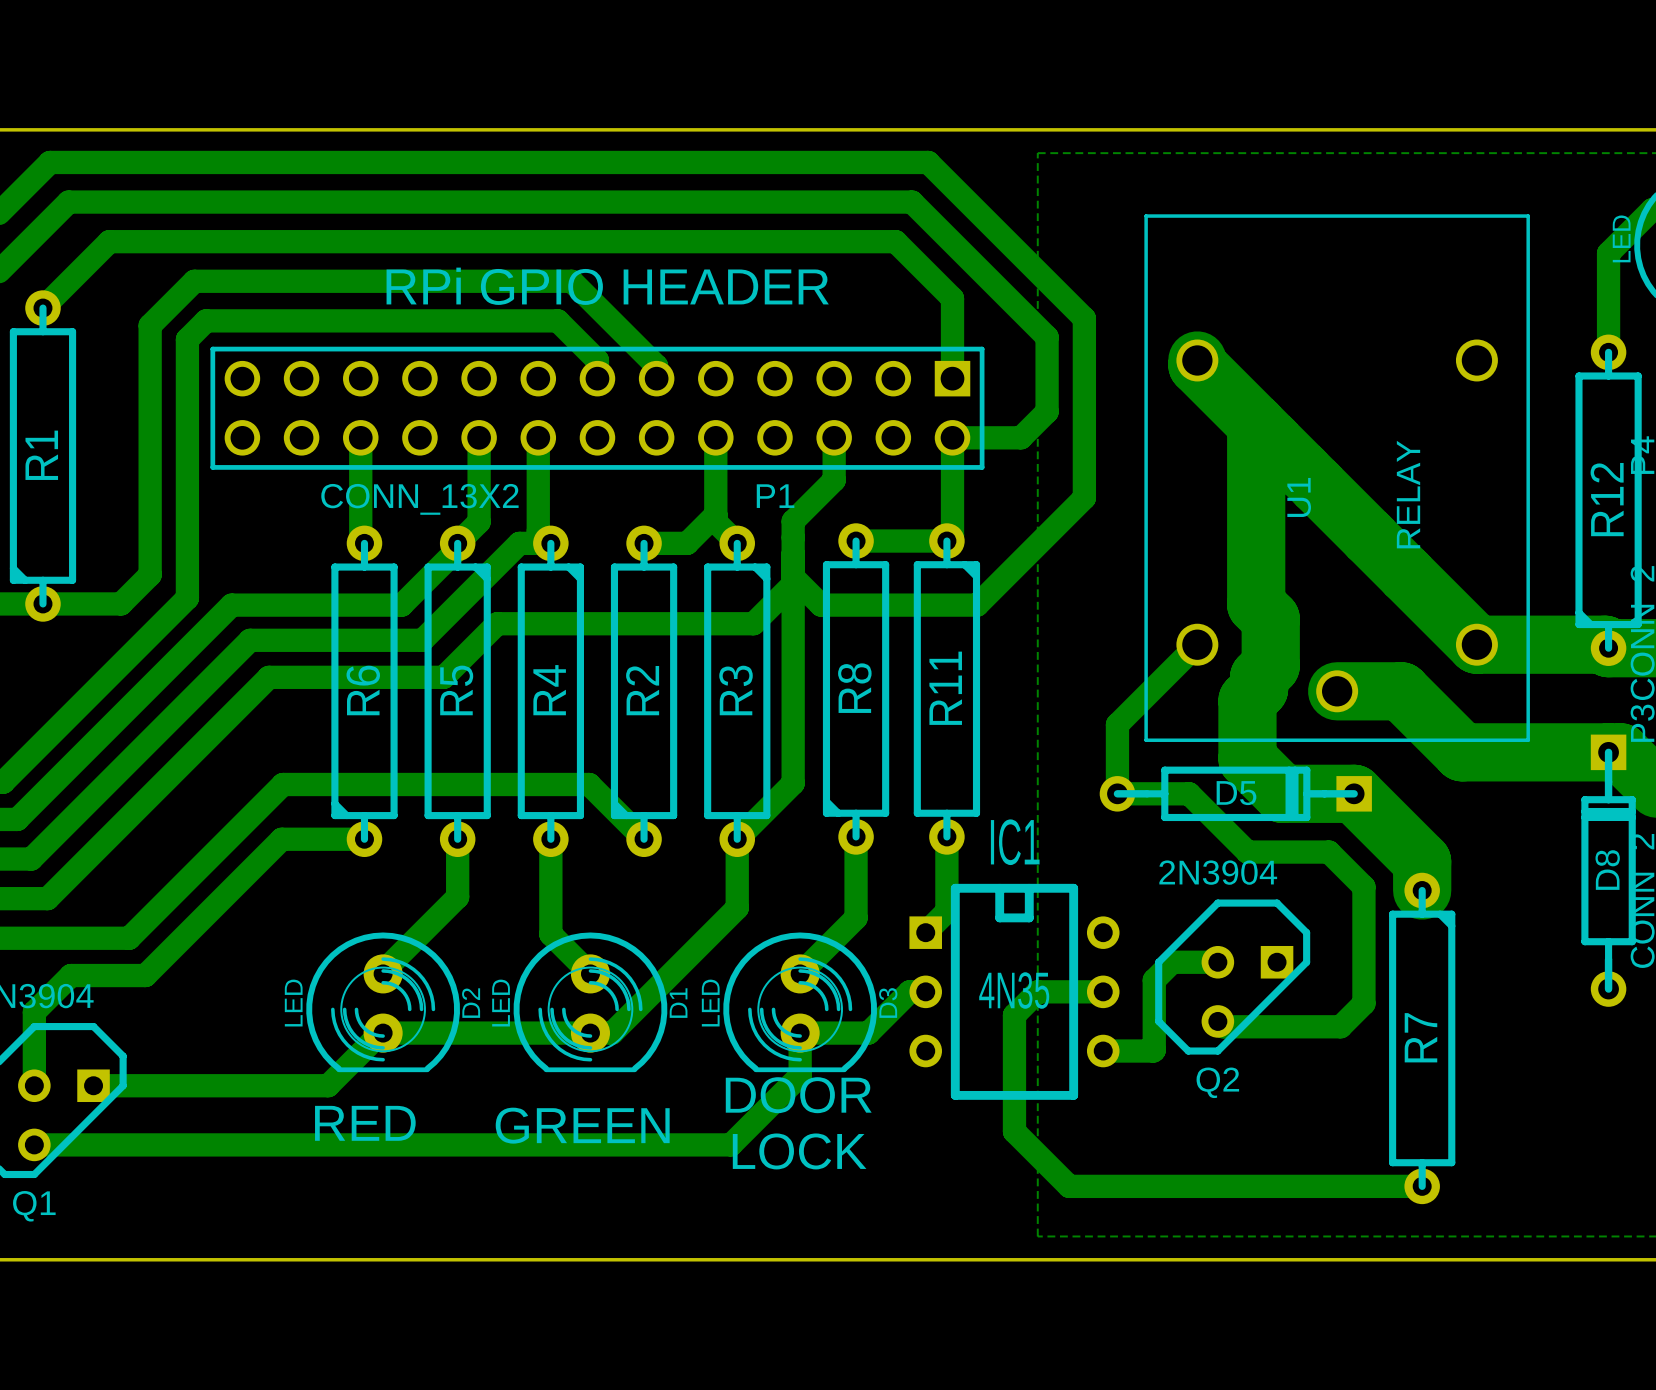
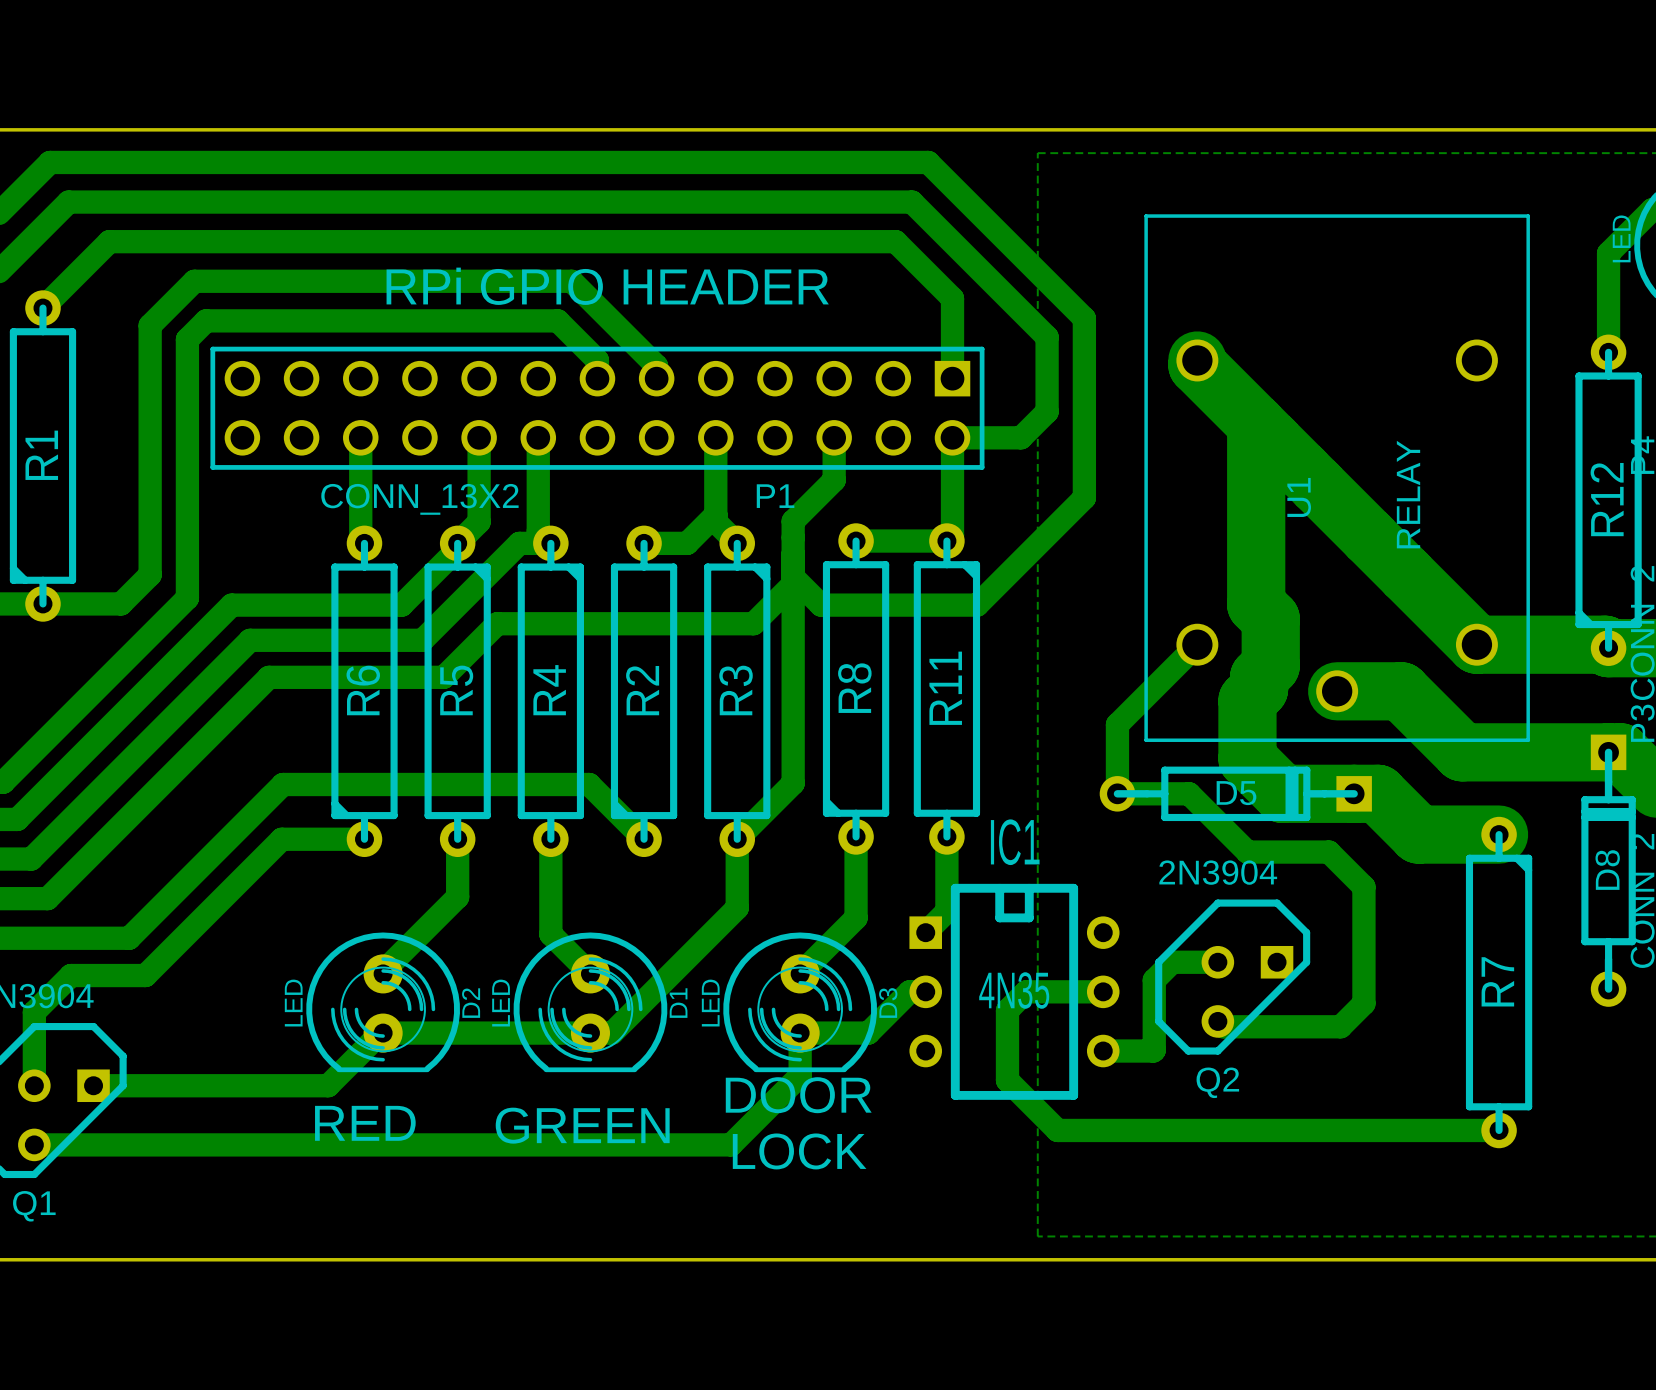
bottom track: (1354, 793) (1422, 861) (1422, 890) -> (1354, 793) (1377, 793) (1418, 834) (1499, 834)
bottom track: (1037, 991) (1014, 1015) (1014, 1131) (1069, 1186) (1422, 1186) -> (1037, 991) (1026, 991) (1007, 1010) (1007, 1080) (1057, 1130) (1499, 1130)
R7 position: (1422, 1038) -> (1499, 982)

